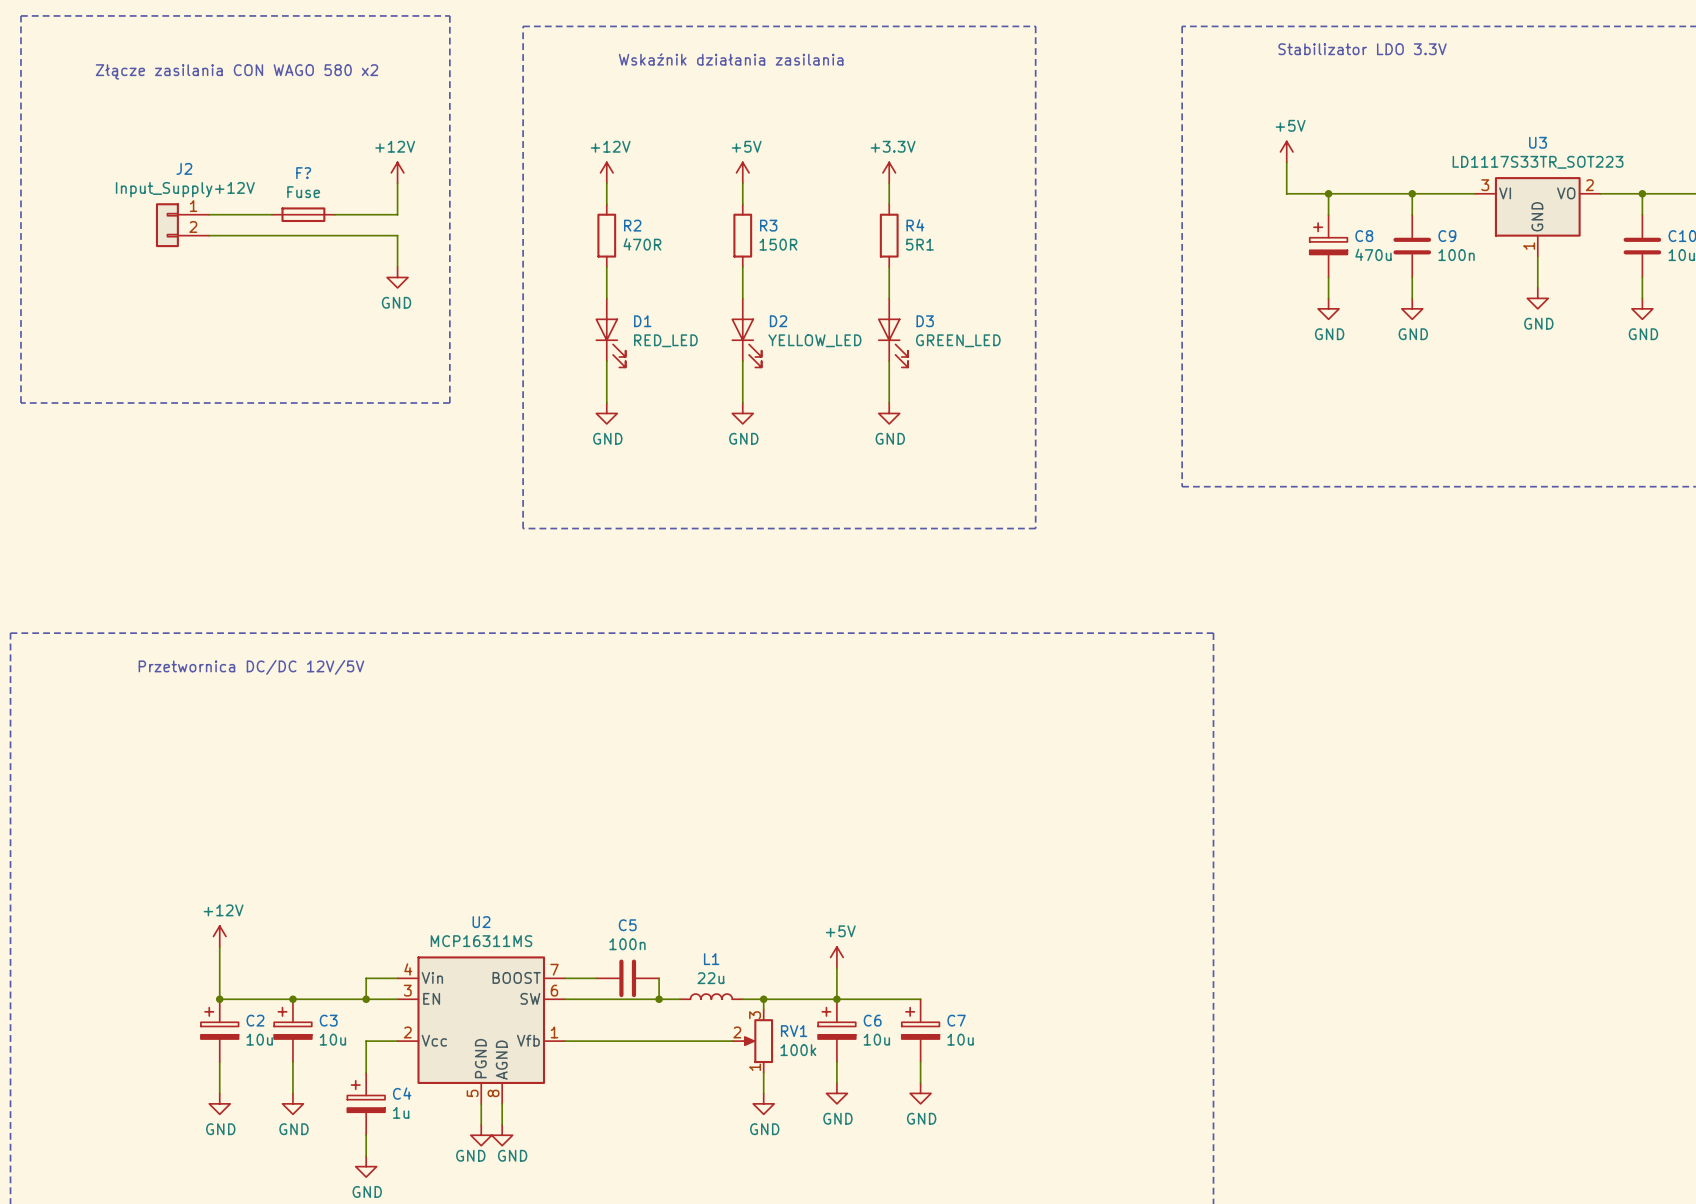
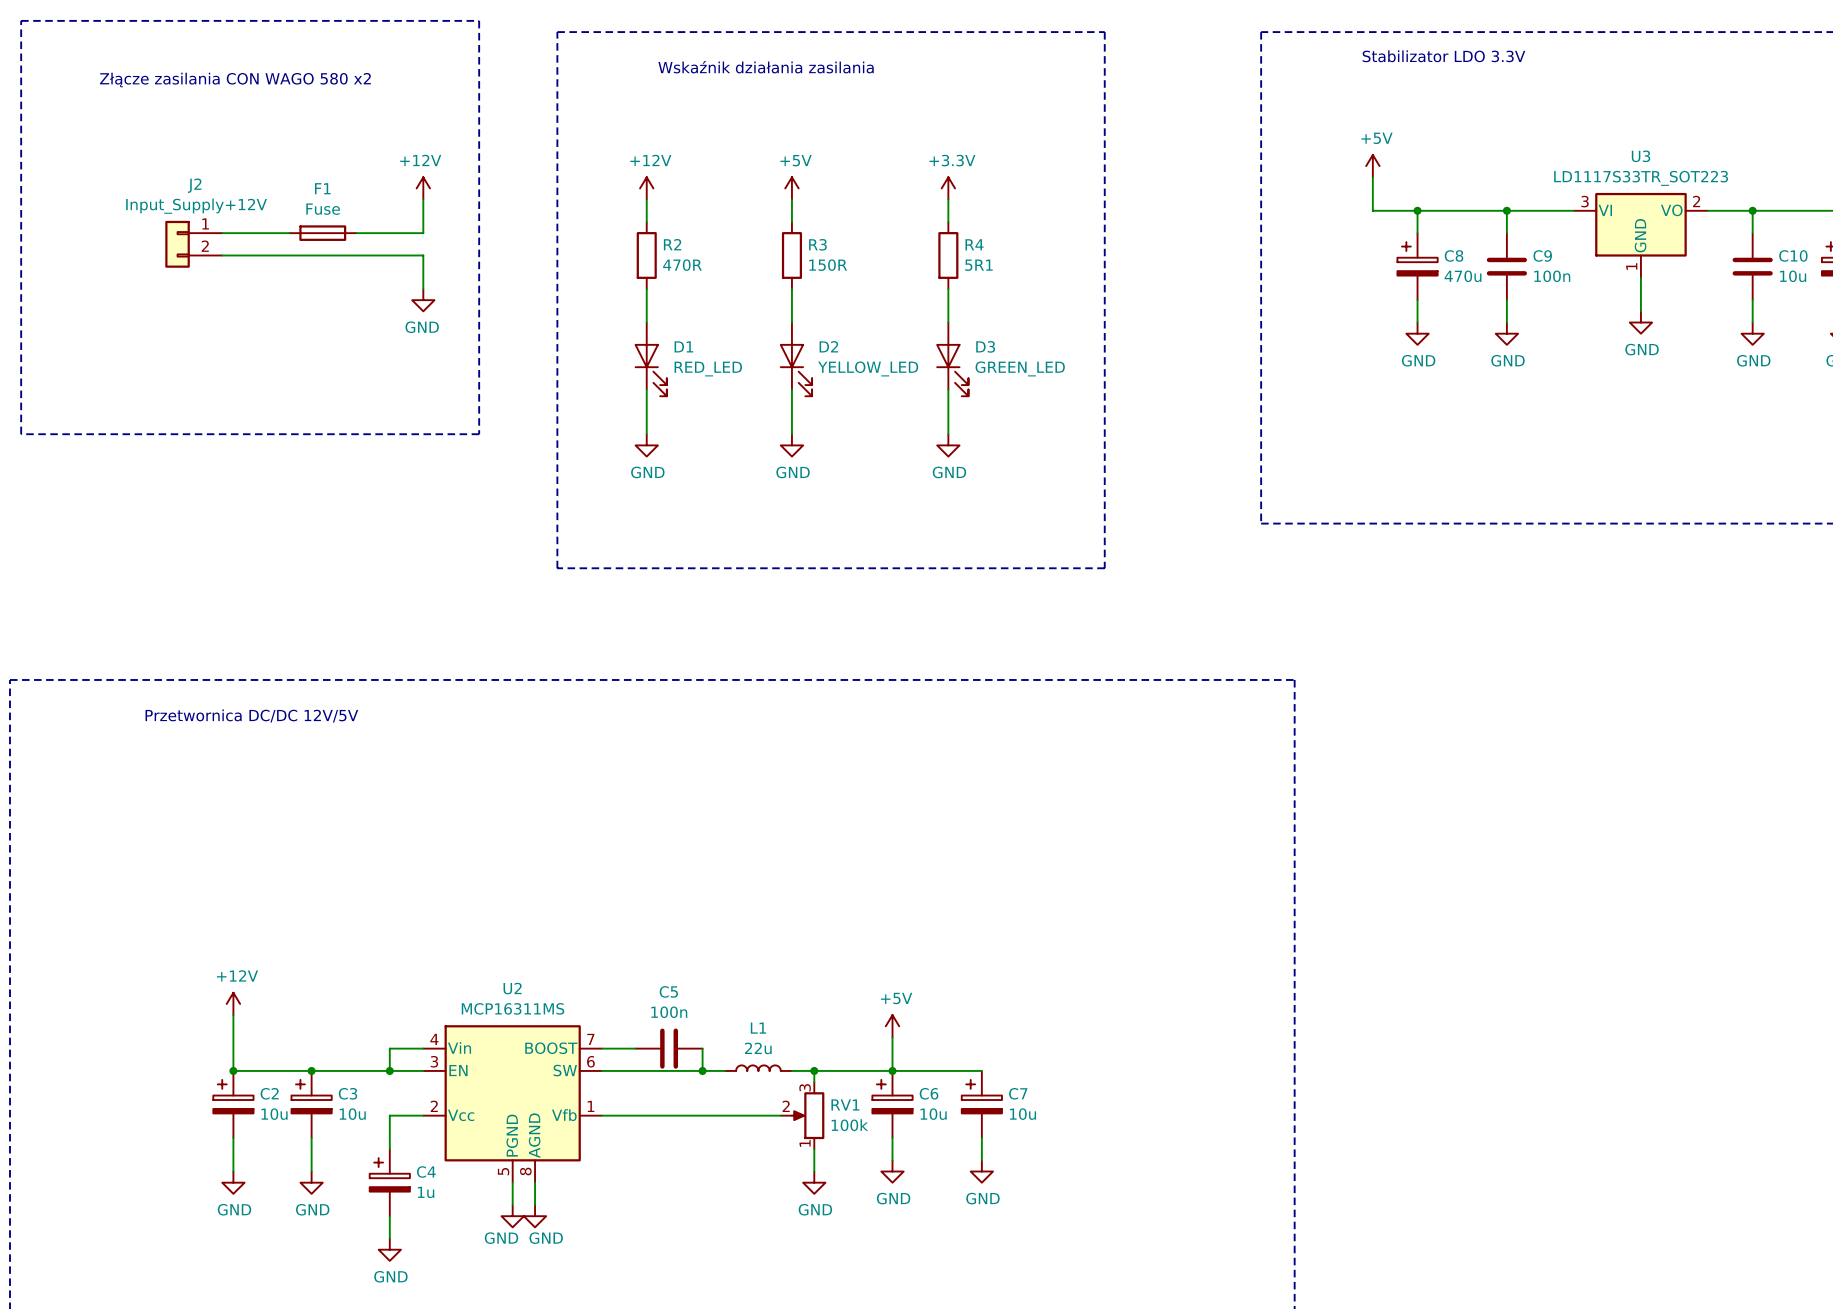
F? name: F? (303, 173) -> F1 (322, 188)

